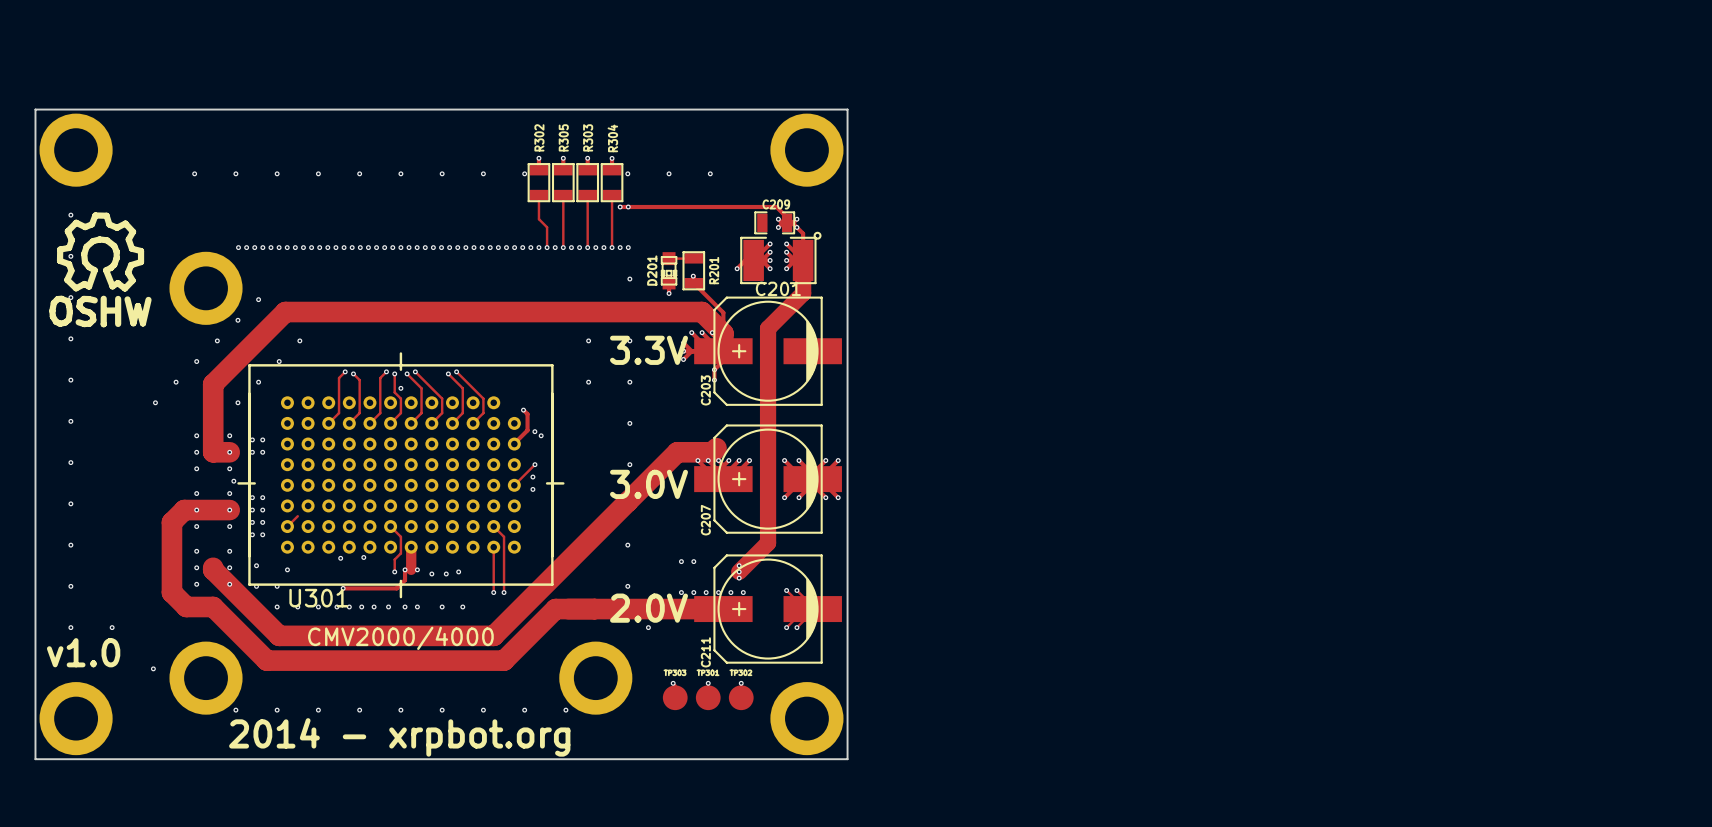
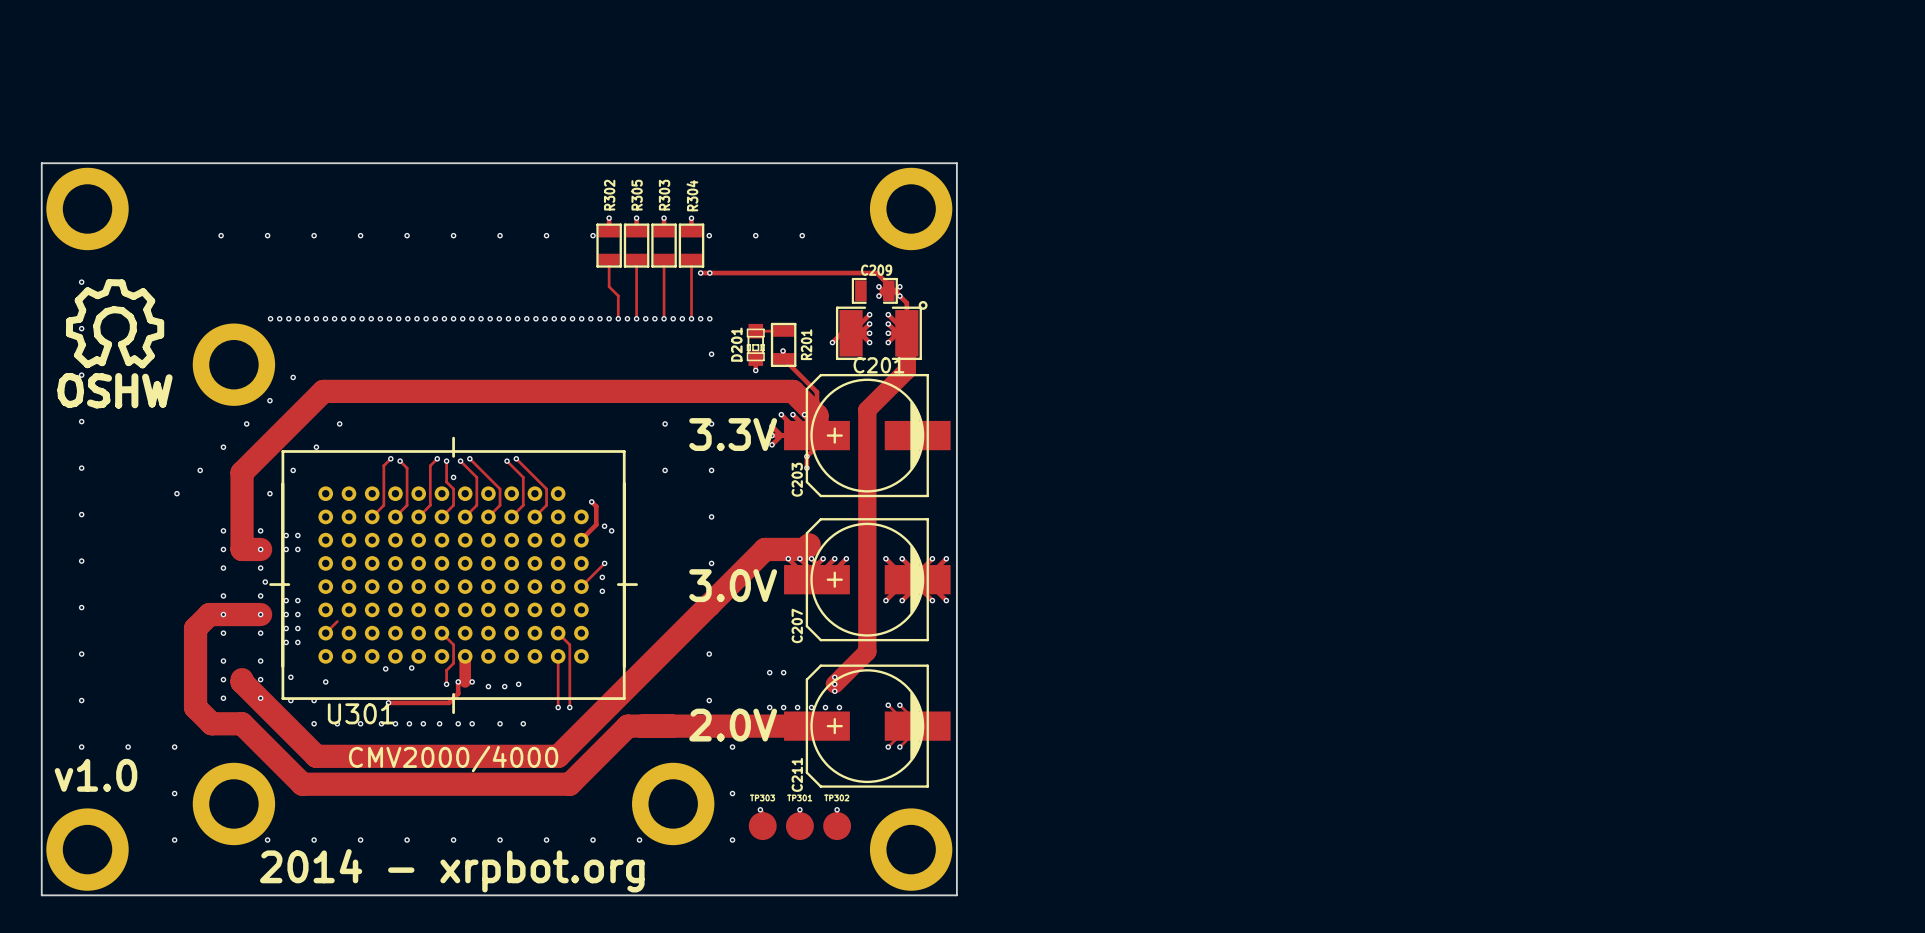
via: none -> (174, 747)
via: none -> (732, 793)
via: none -> (174, 840)
via: none -> (732, 840)

